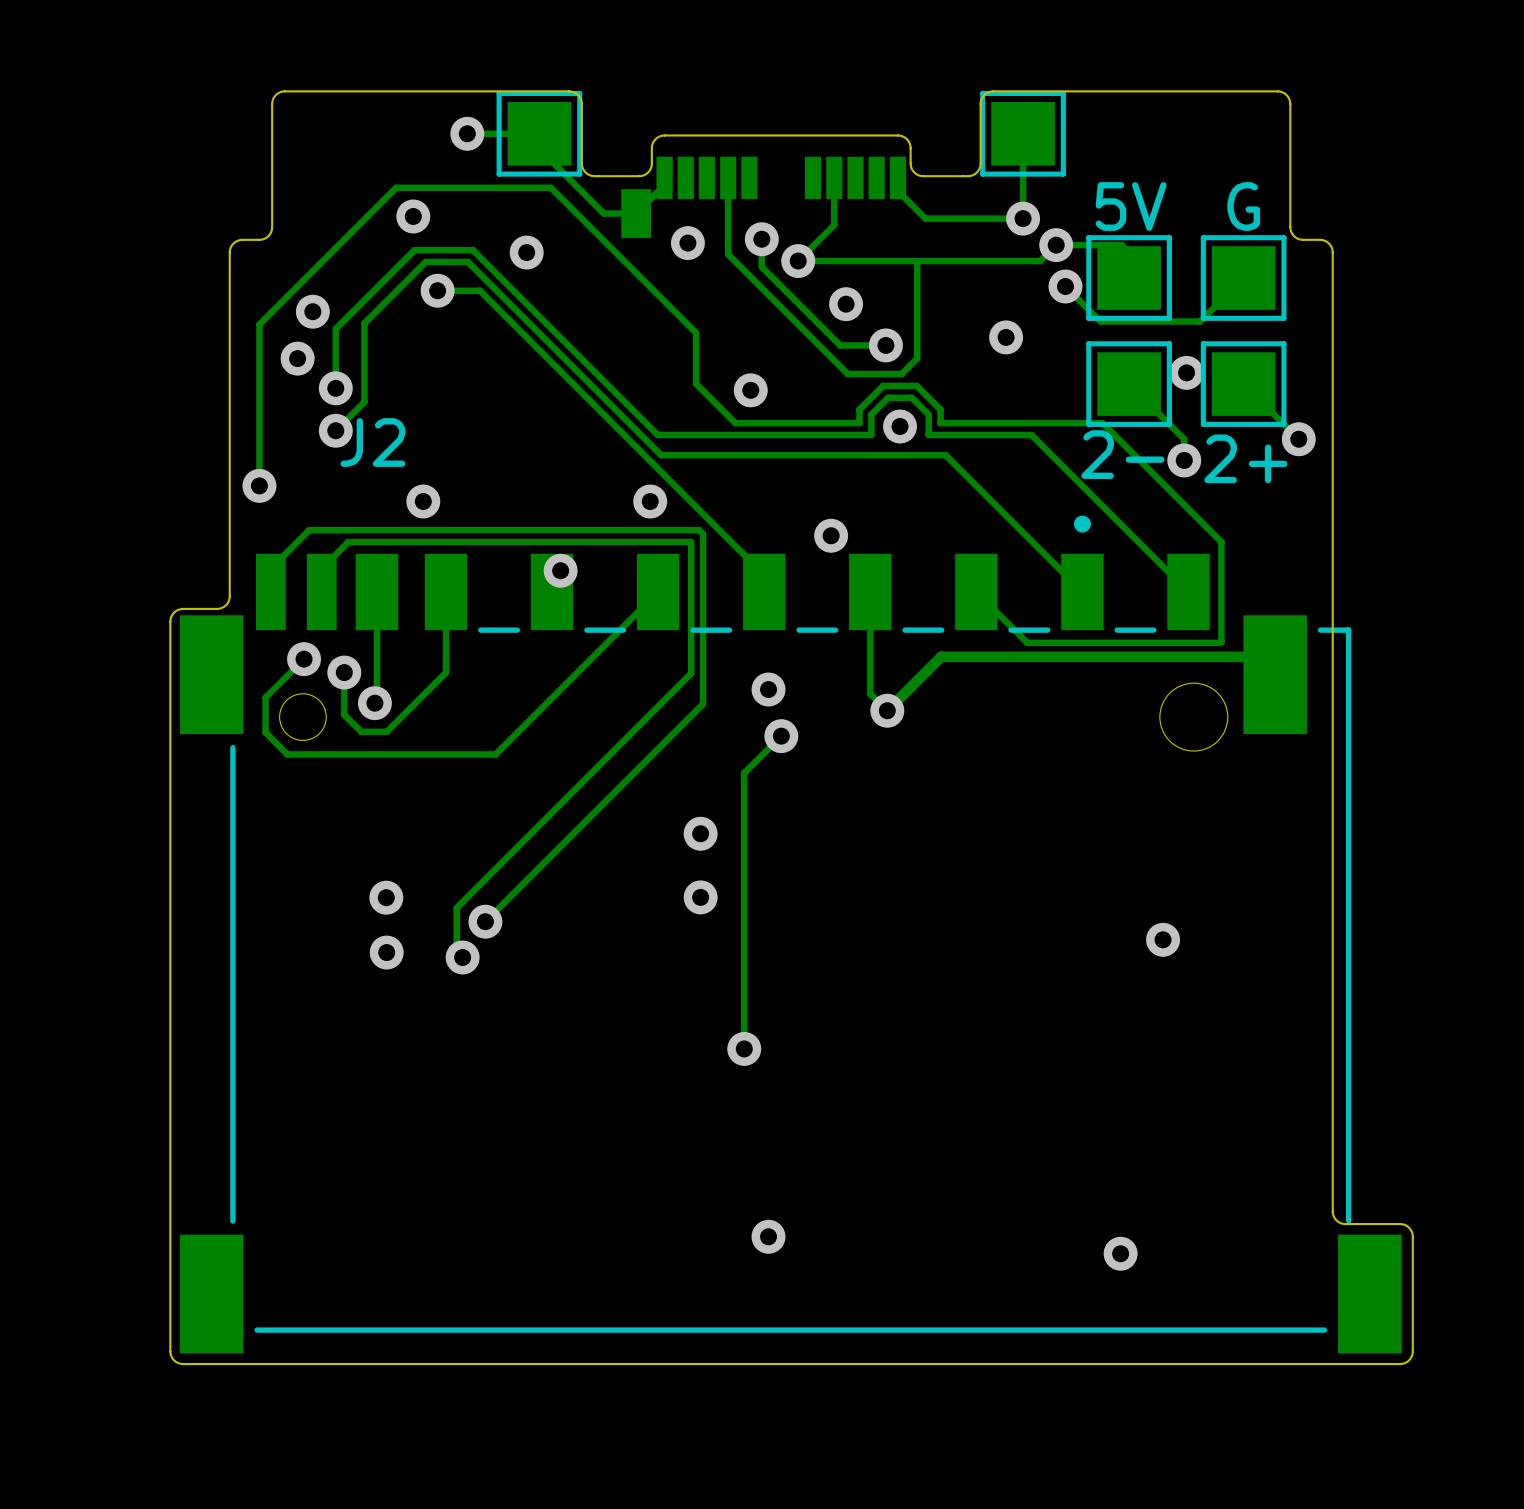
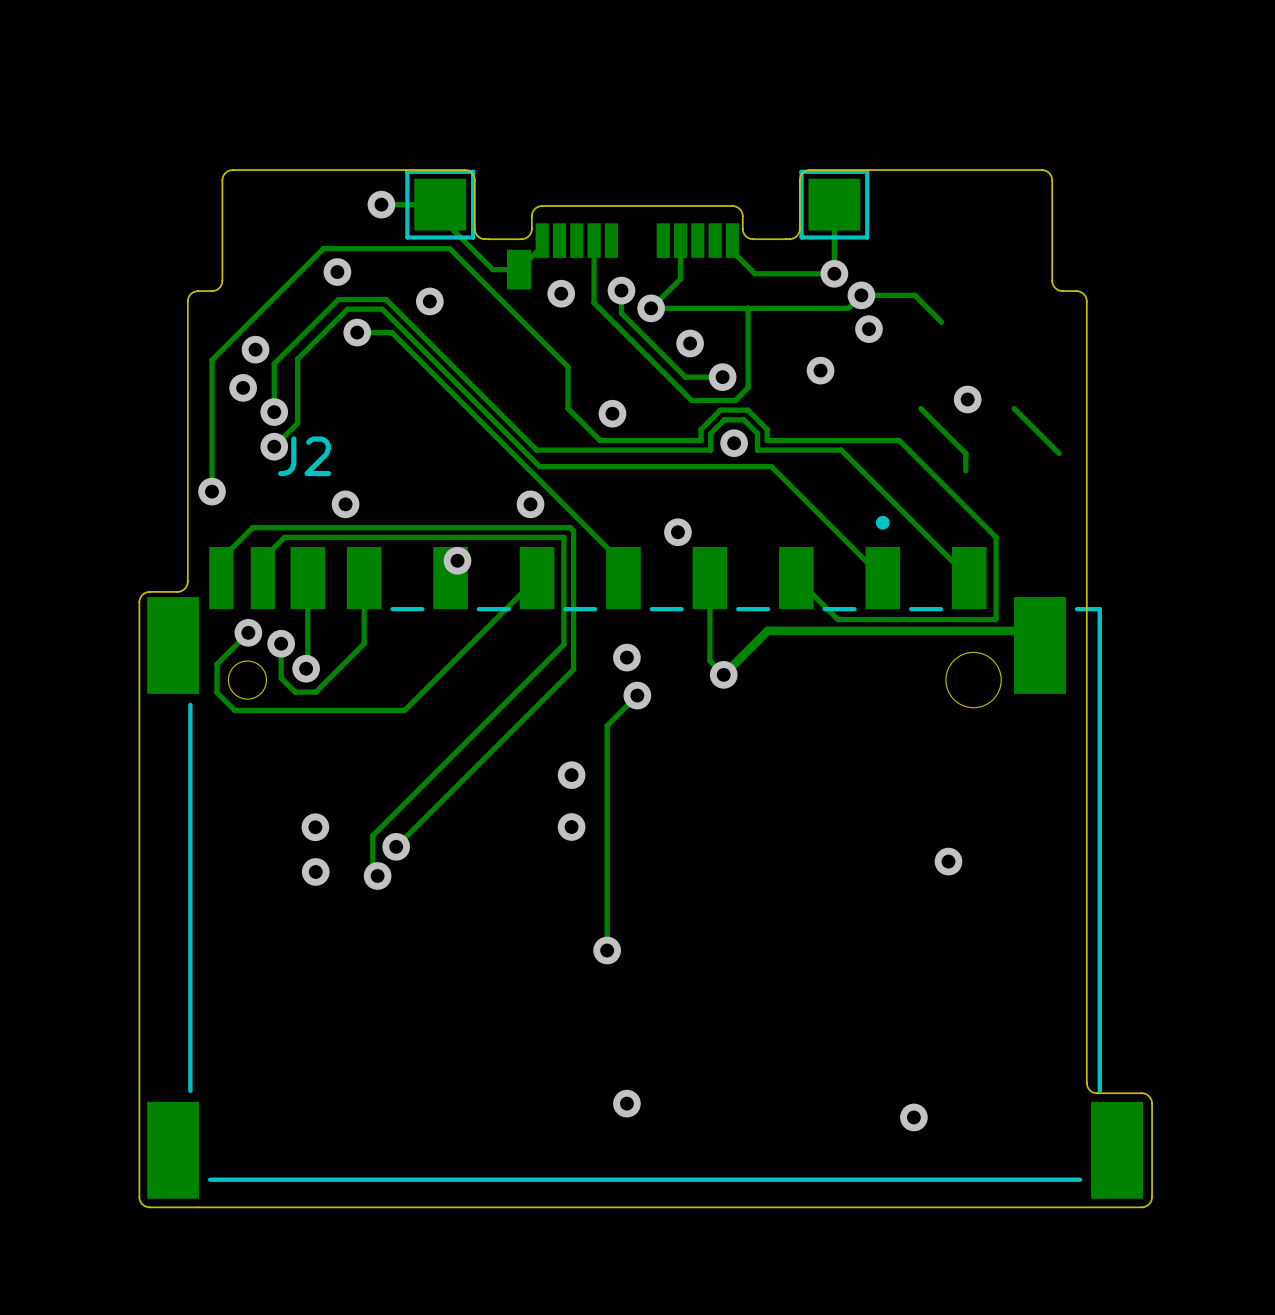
5V: (1129, 278) -> none
track: (1243, 278) (1200, 321) (1100, 321) (1065, 286) -> none
G: (1243, 278) -> none
2-: (1129, 384) -> none
2+: (1243, 384) -> none
via: (1298, 439) -> none
via: (1184, 460) -> none

